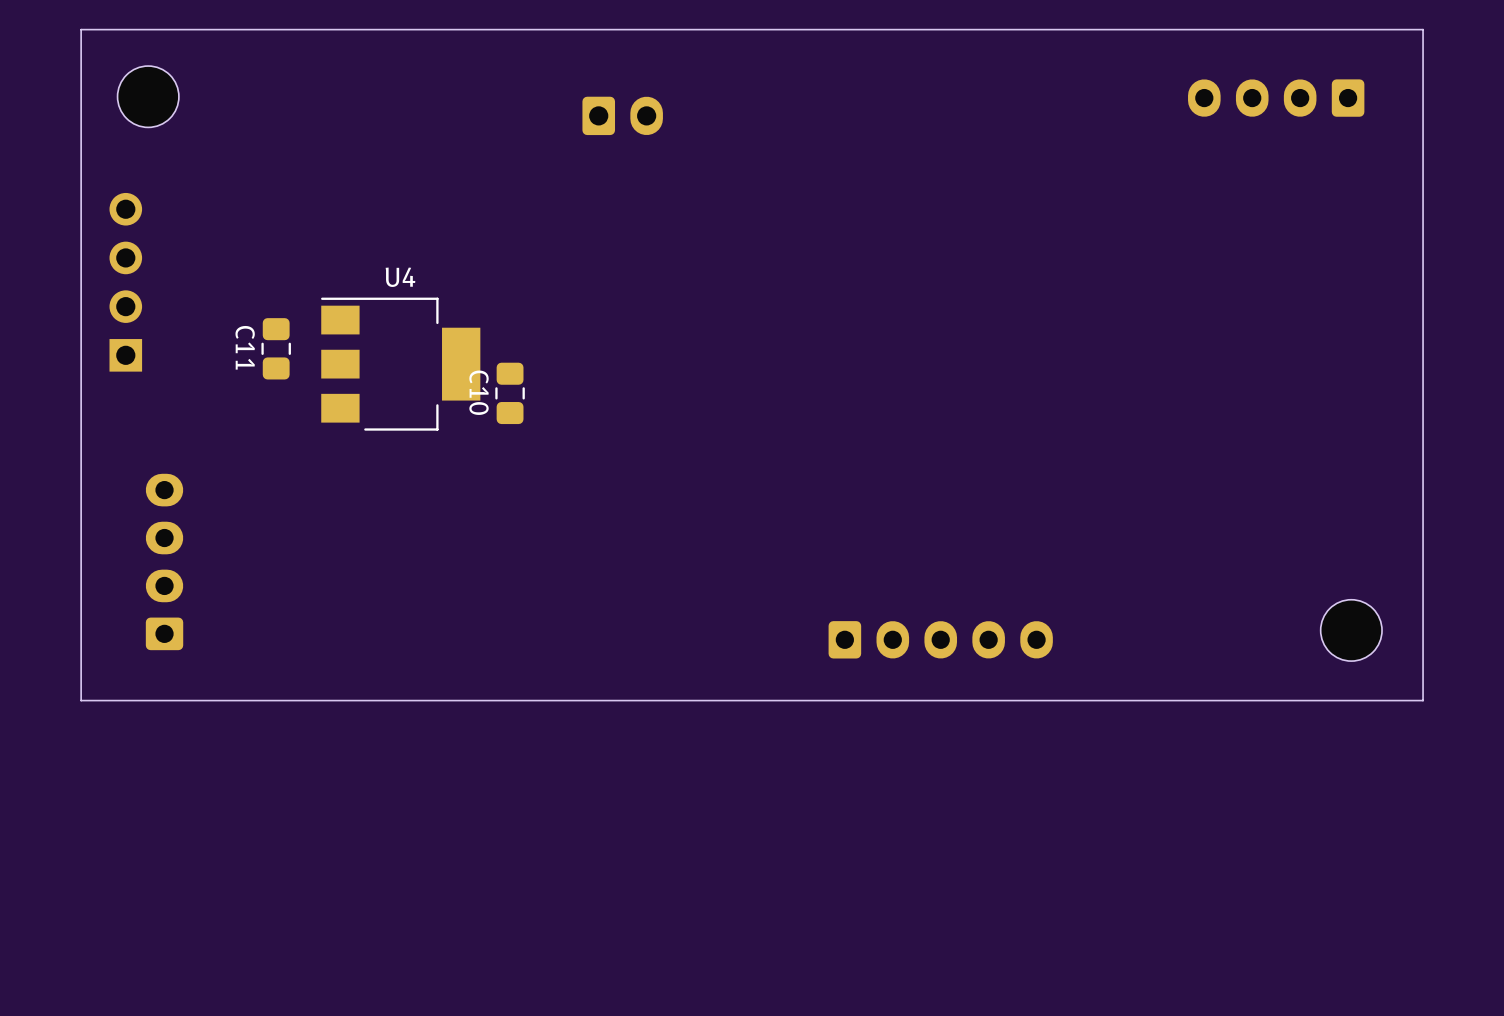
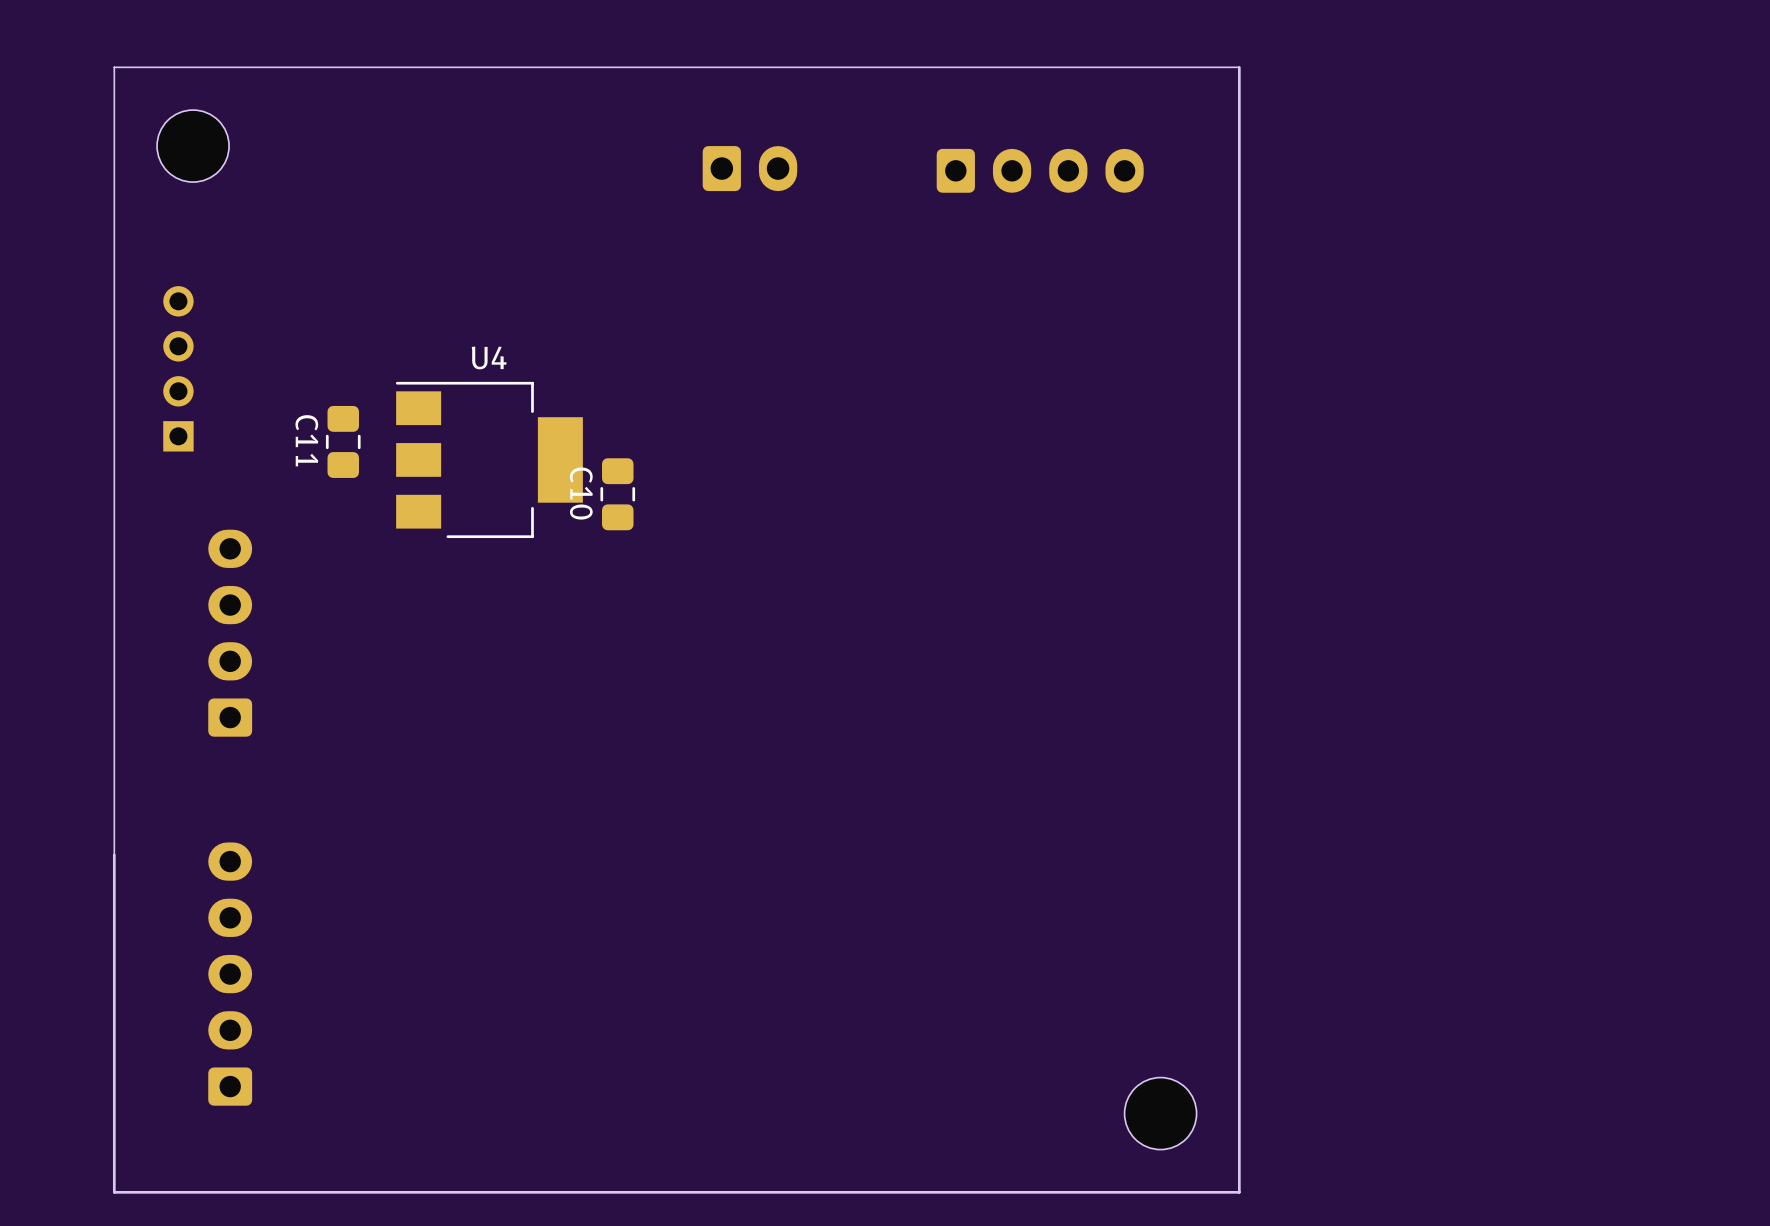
board edge: (1039, 29) (1423, 29) (1423, 700) (81, 700) -> (1239, 67) (1239, 1192) (114, 1192) (114, 854)
part rotation: 0° (1276, 98) -> 180° (1040, 170)
part position: (1276, 98) -> (1040, 170)
part footprint: [109, 192, 143, 372] -> [163, 286, 194, 452]
part position: (164, 561) -> (230, 633)
part position: (1351, 630) -> (1160, 1113)
part: (940, 639) -> none
part: none -> (230, 974)

